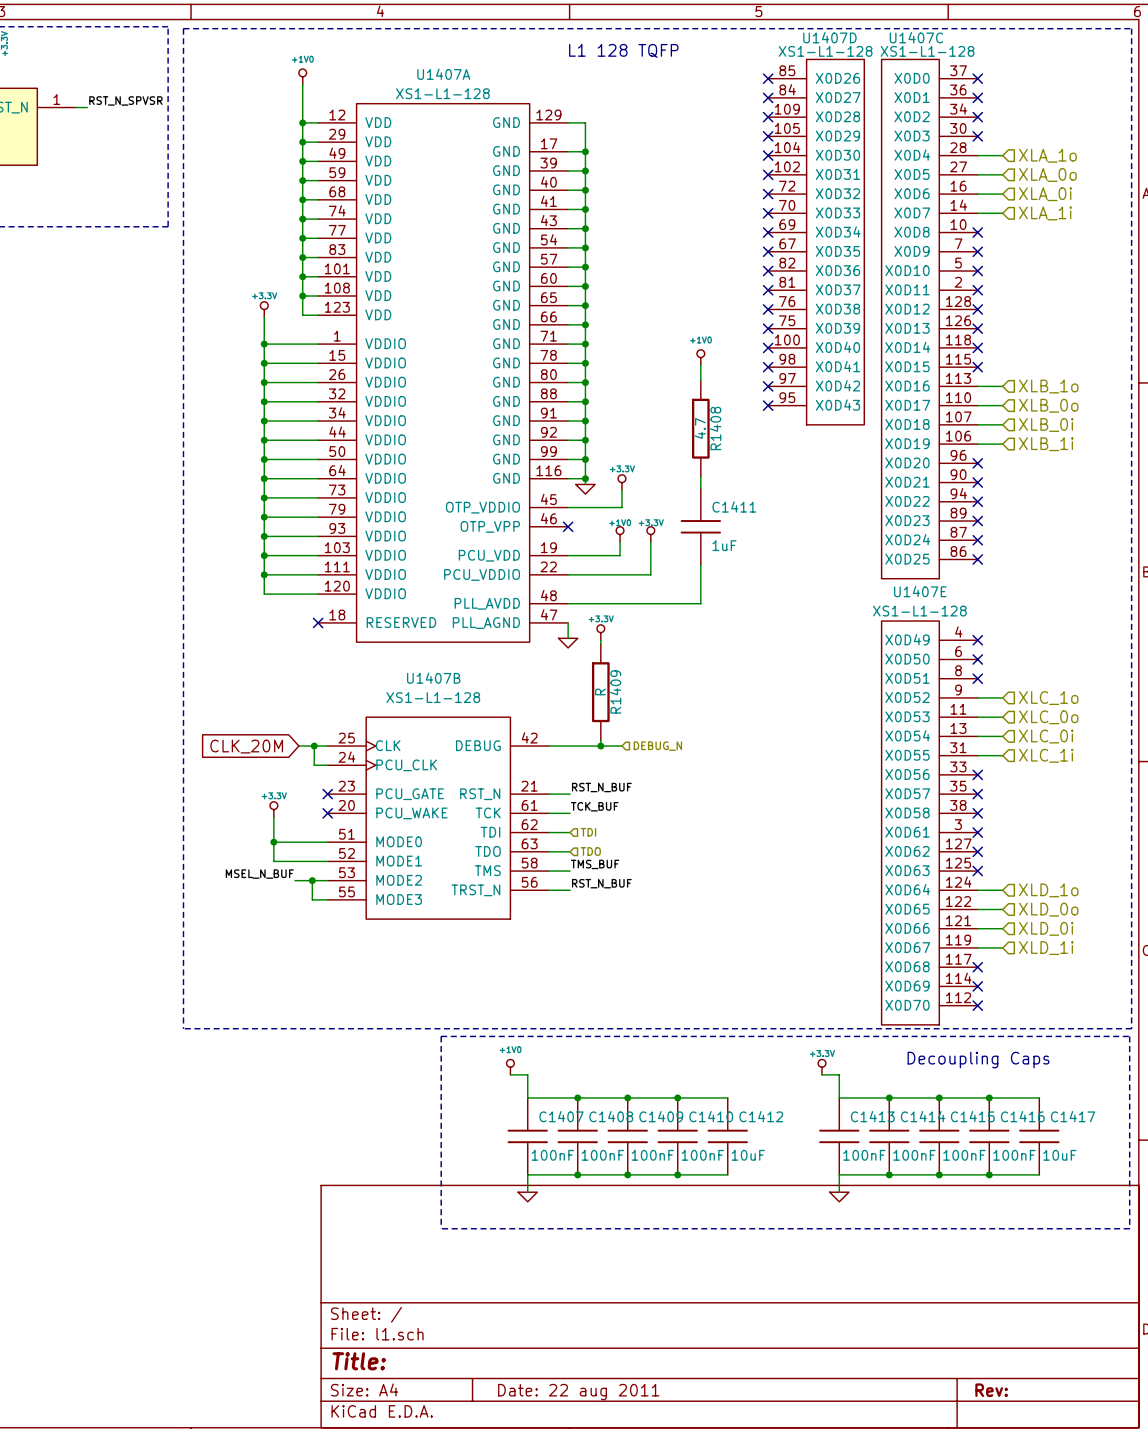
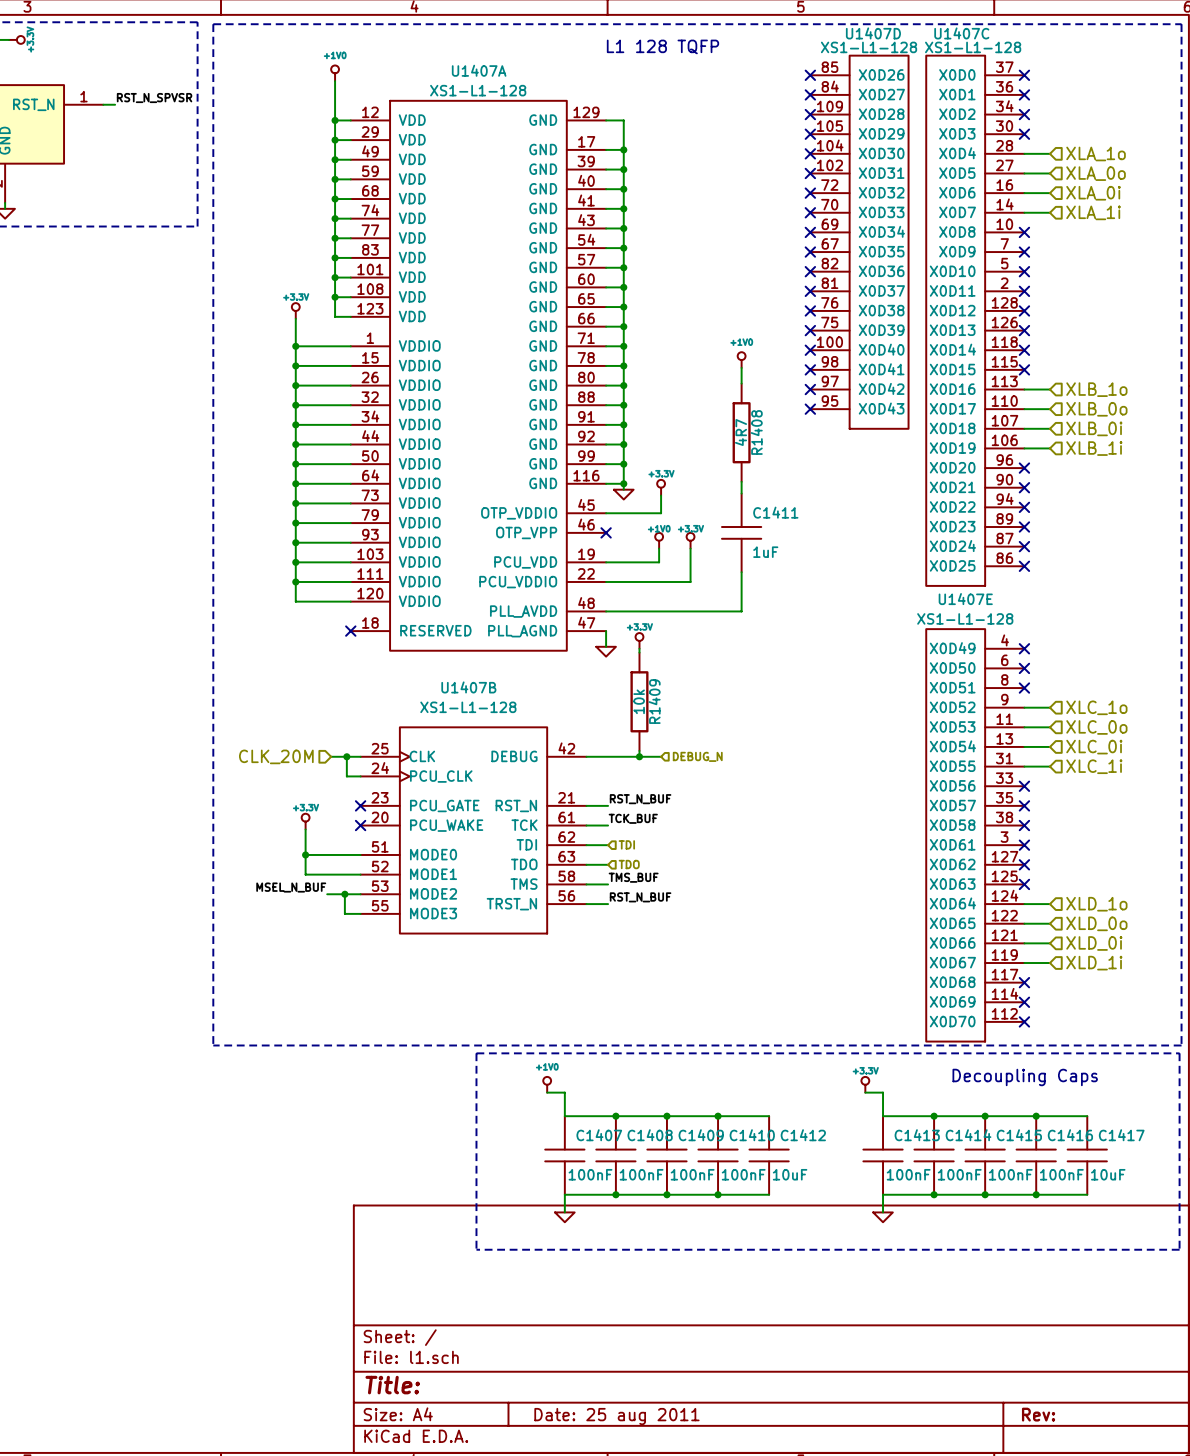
R1408 value: 4.7 (700, 428) -> 4R7 (741, 432)
R1409 value: R (600, 691) -> 10k (639, 701)
hierarchical label: none -> CLK_20M (276, 756)
global label: CLK_20M (246, 746) -> none
title block: Date: 22 aug 2011 (578, 1392) -> Date: 25 aug 2011 (616, 1416)

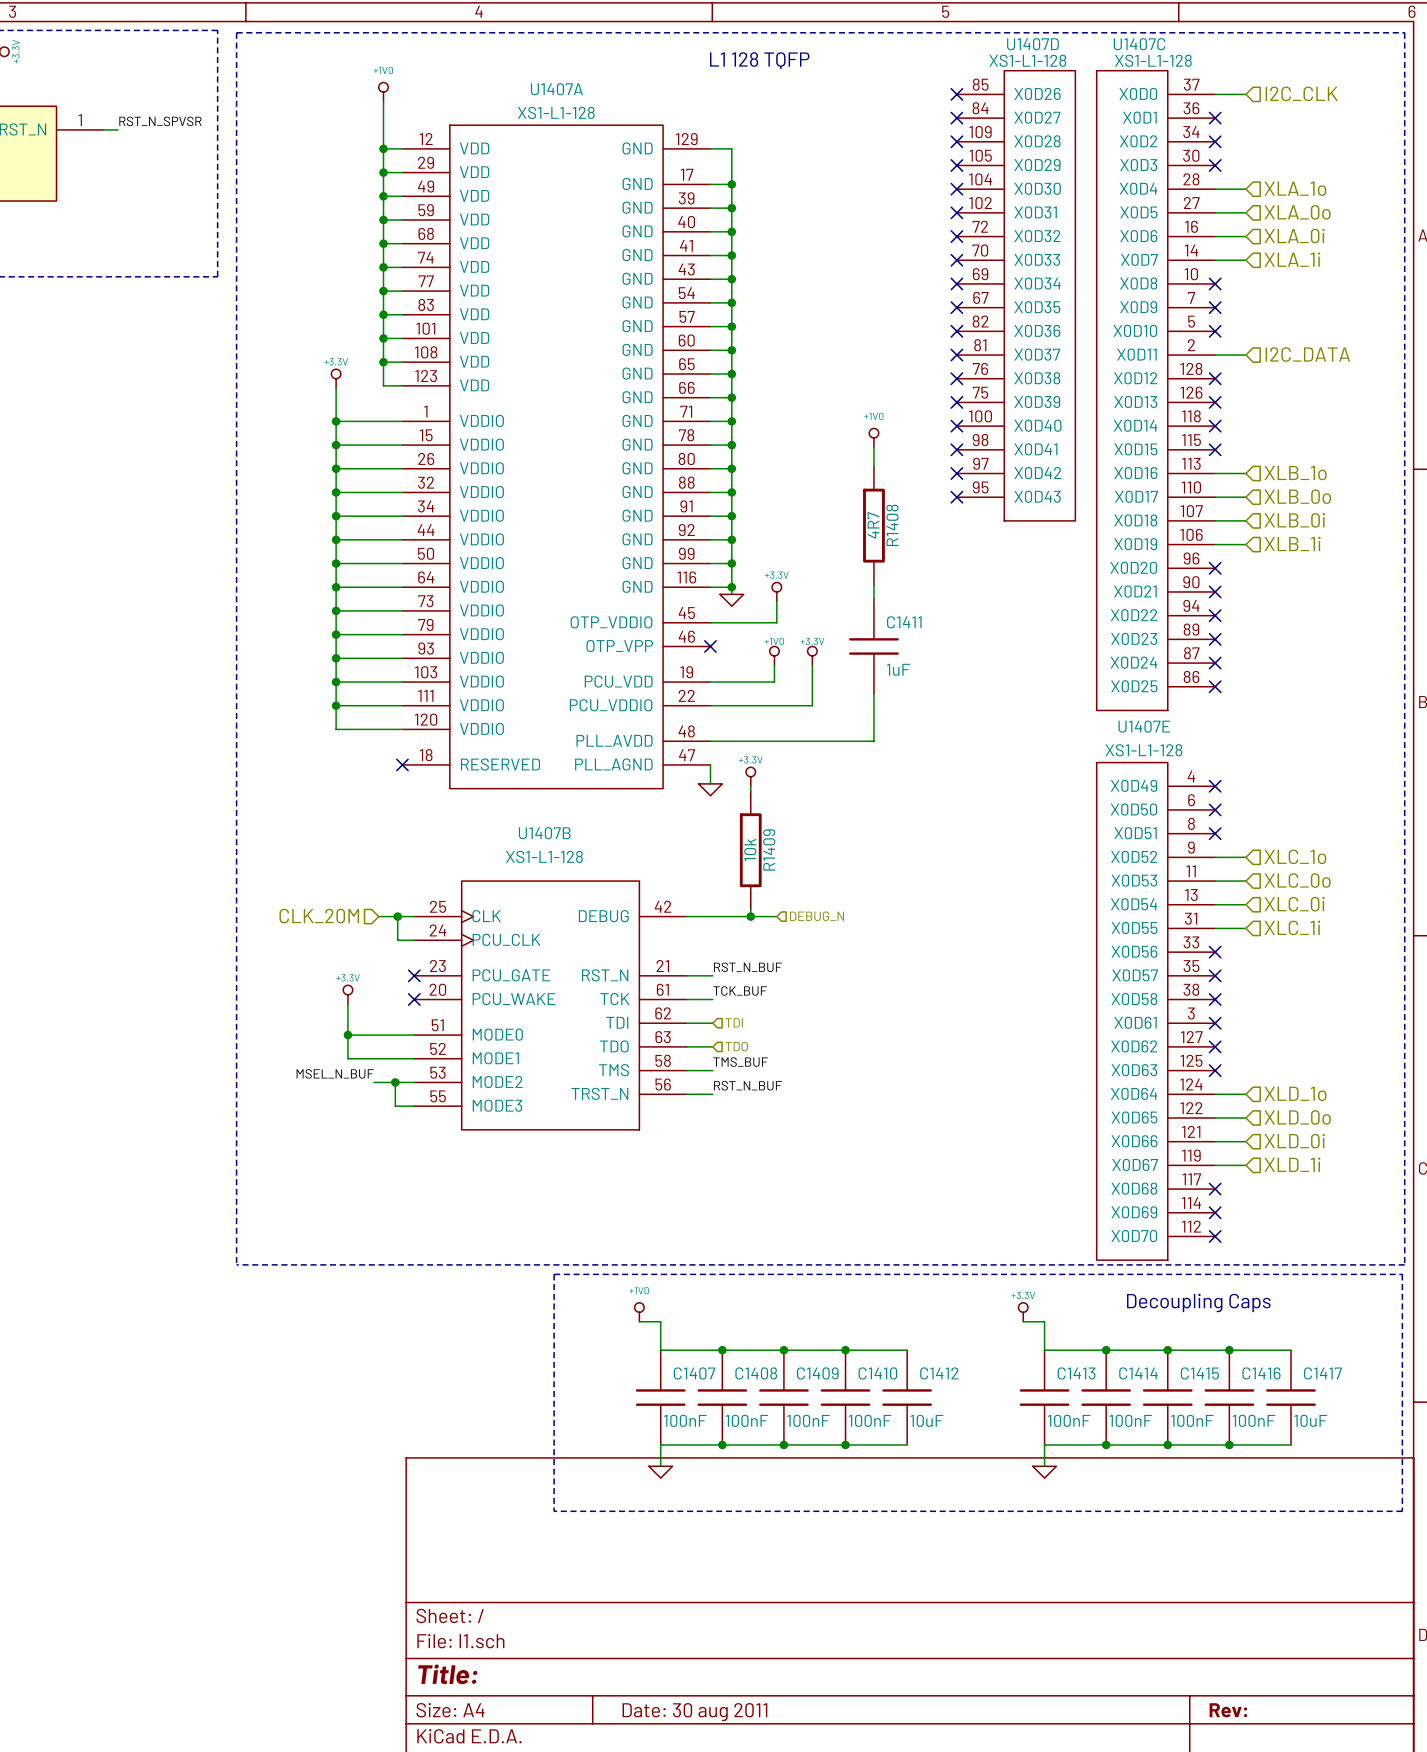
wire: none -> (1215, 94) (1245, 94)
no-connect mark: (1024, 75) -> none
hierarchical label: none -> I2C_CLK (1301, 93)
wire: none -> (1215, 355) (1245, 355)
no-connect mark: (1024, 291) -> none
hierarchical label: none -> I2C_DATA (1307, 354)
title block: Date: 25 aug 2011 (616, 1416) -> Date: 30 aug 2011 (694, 1712)

